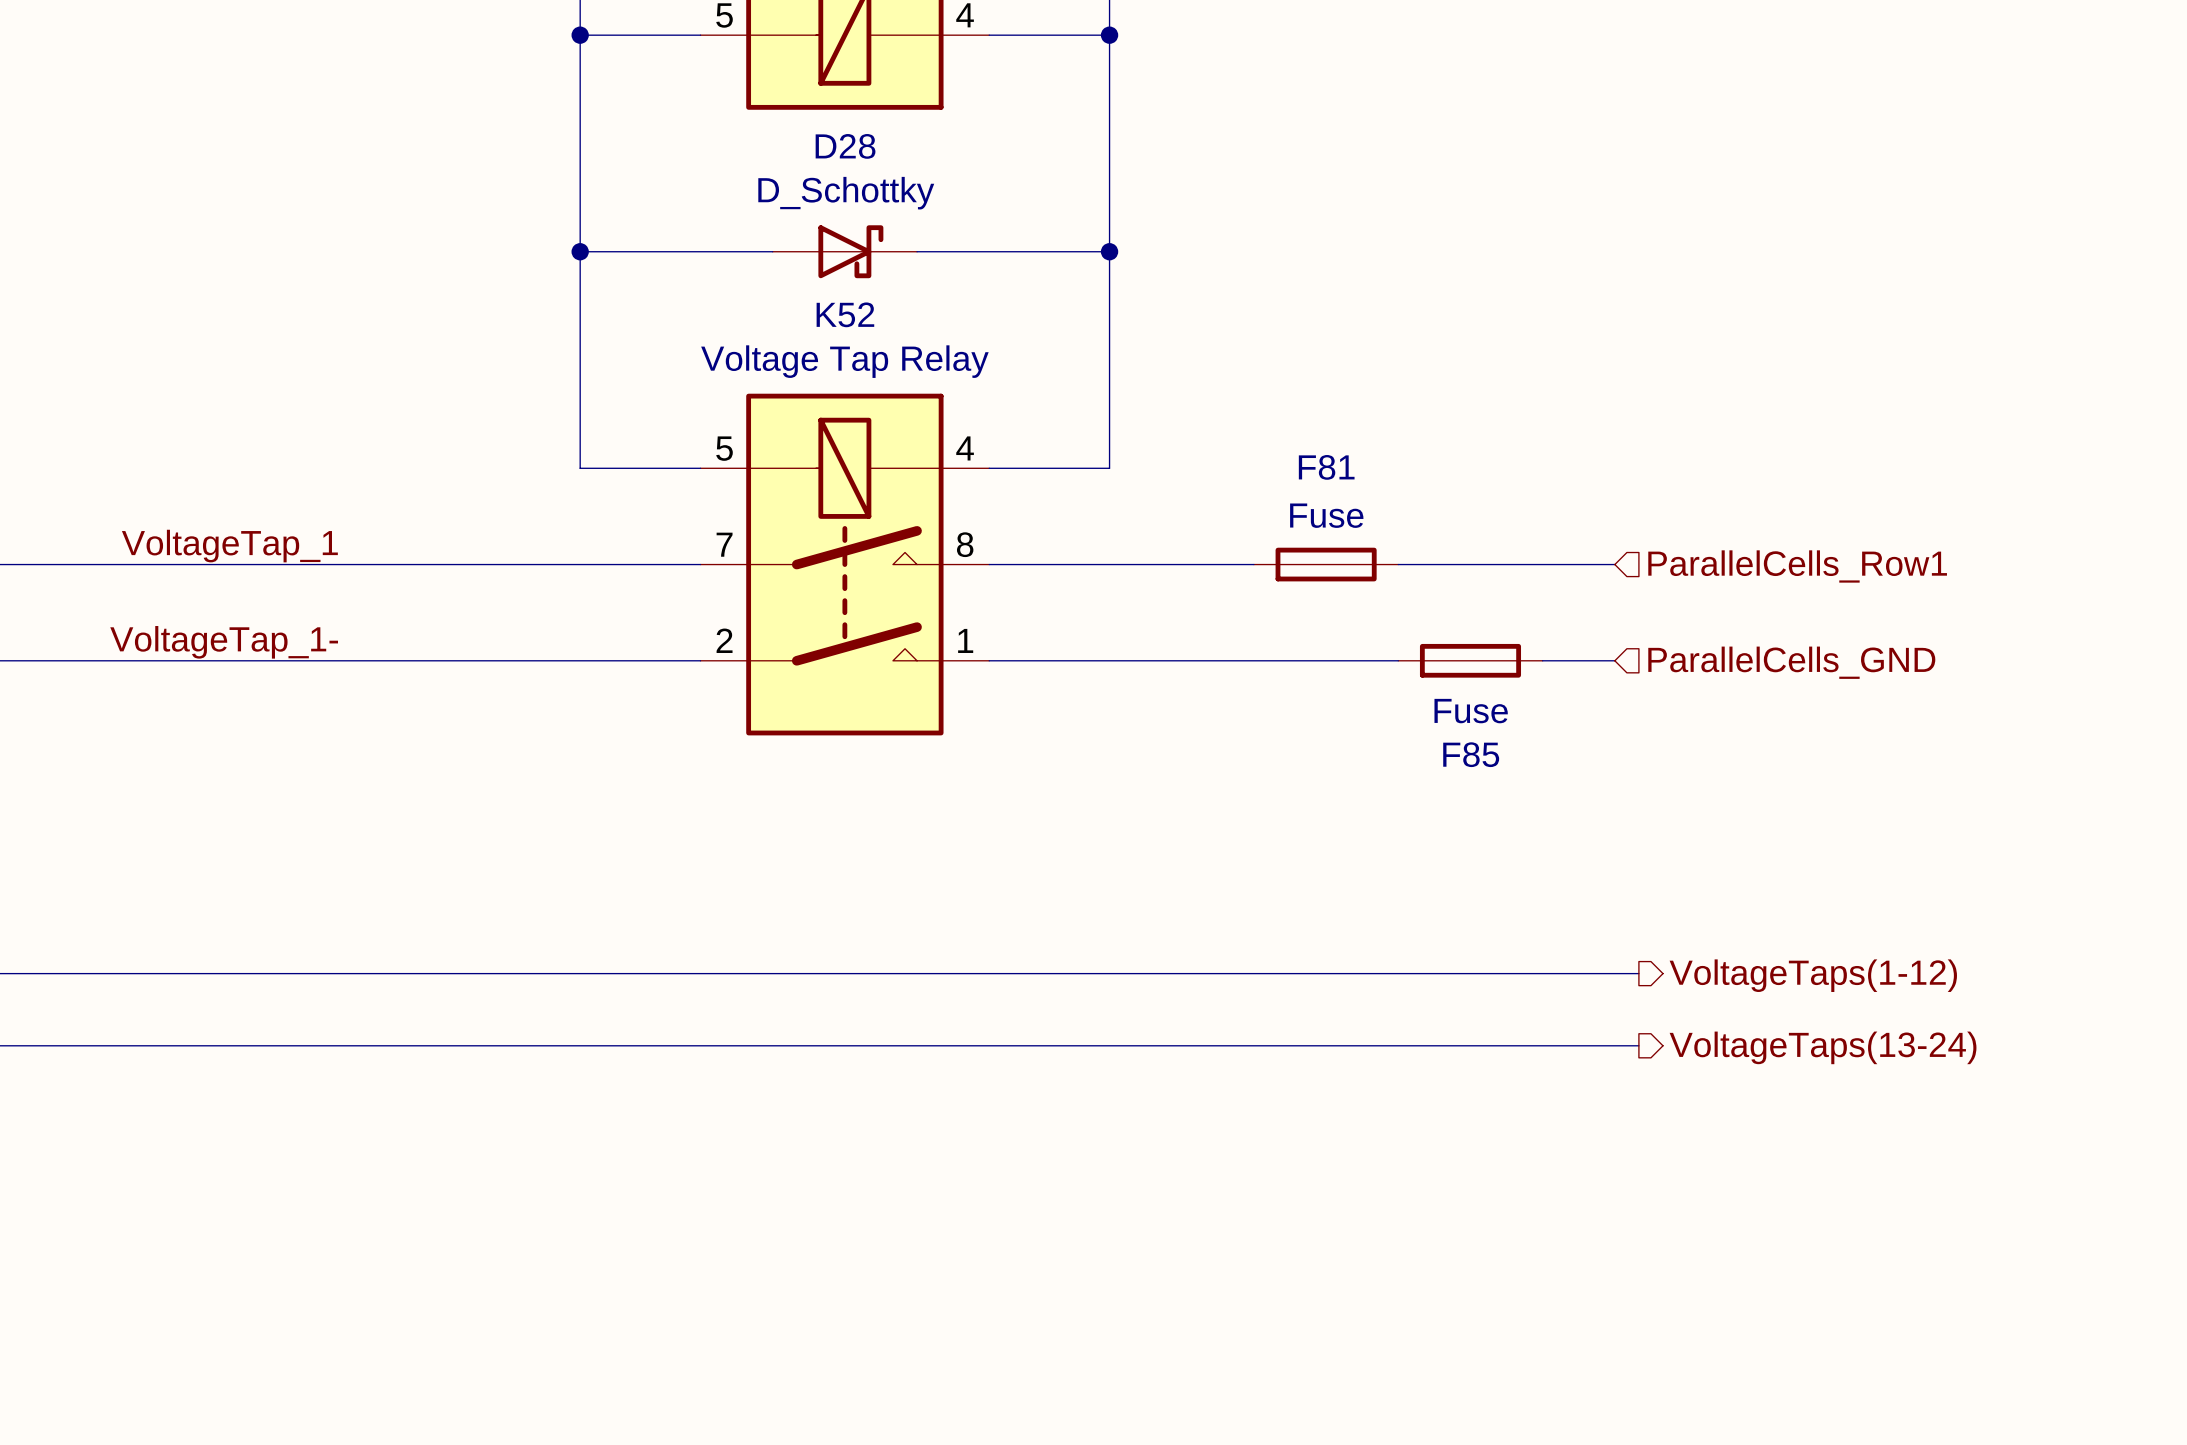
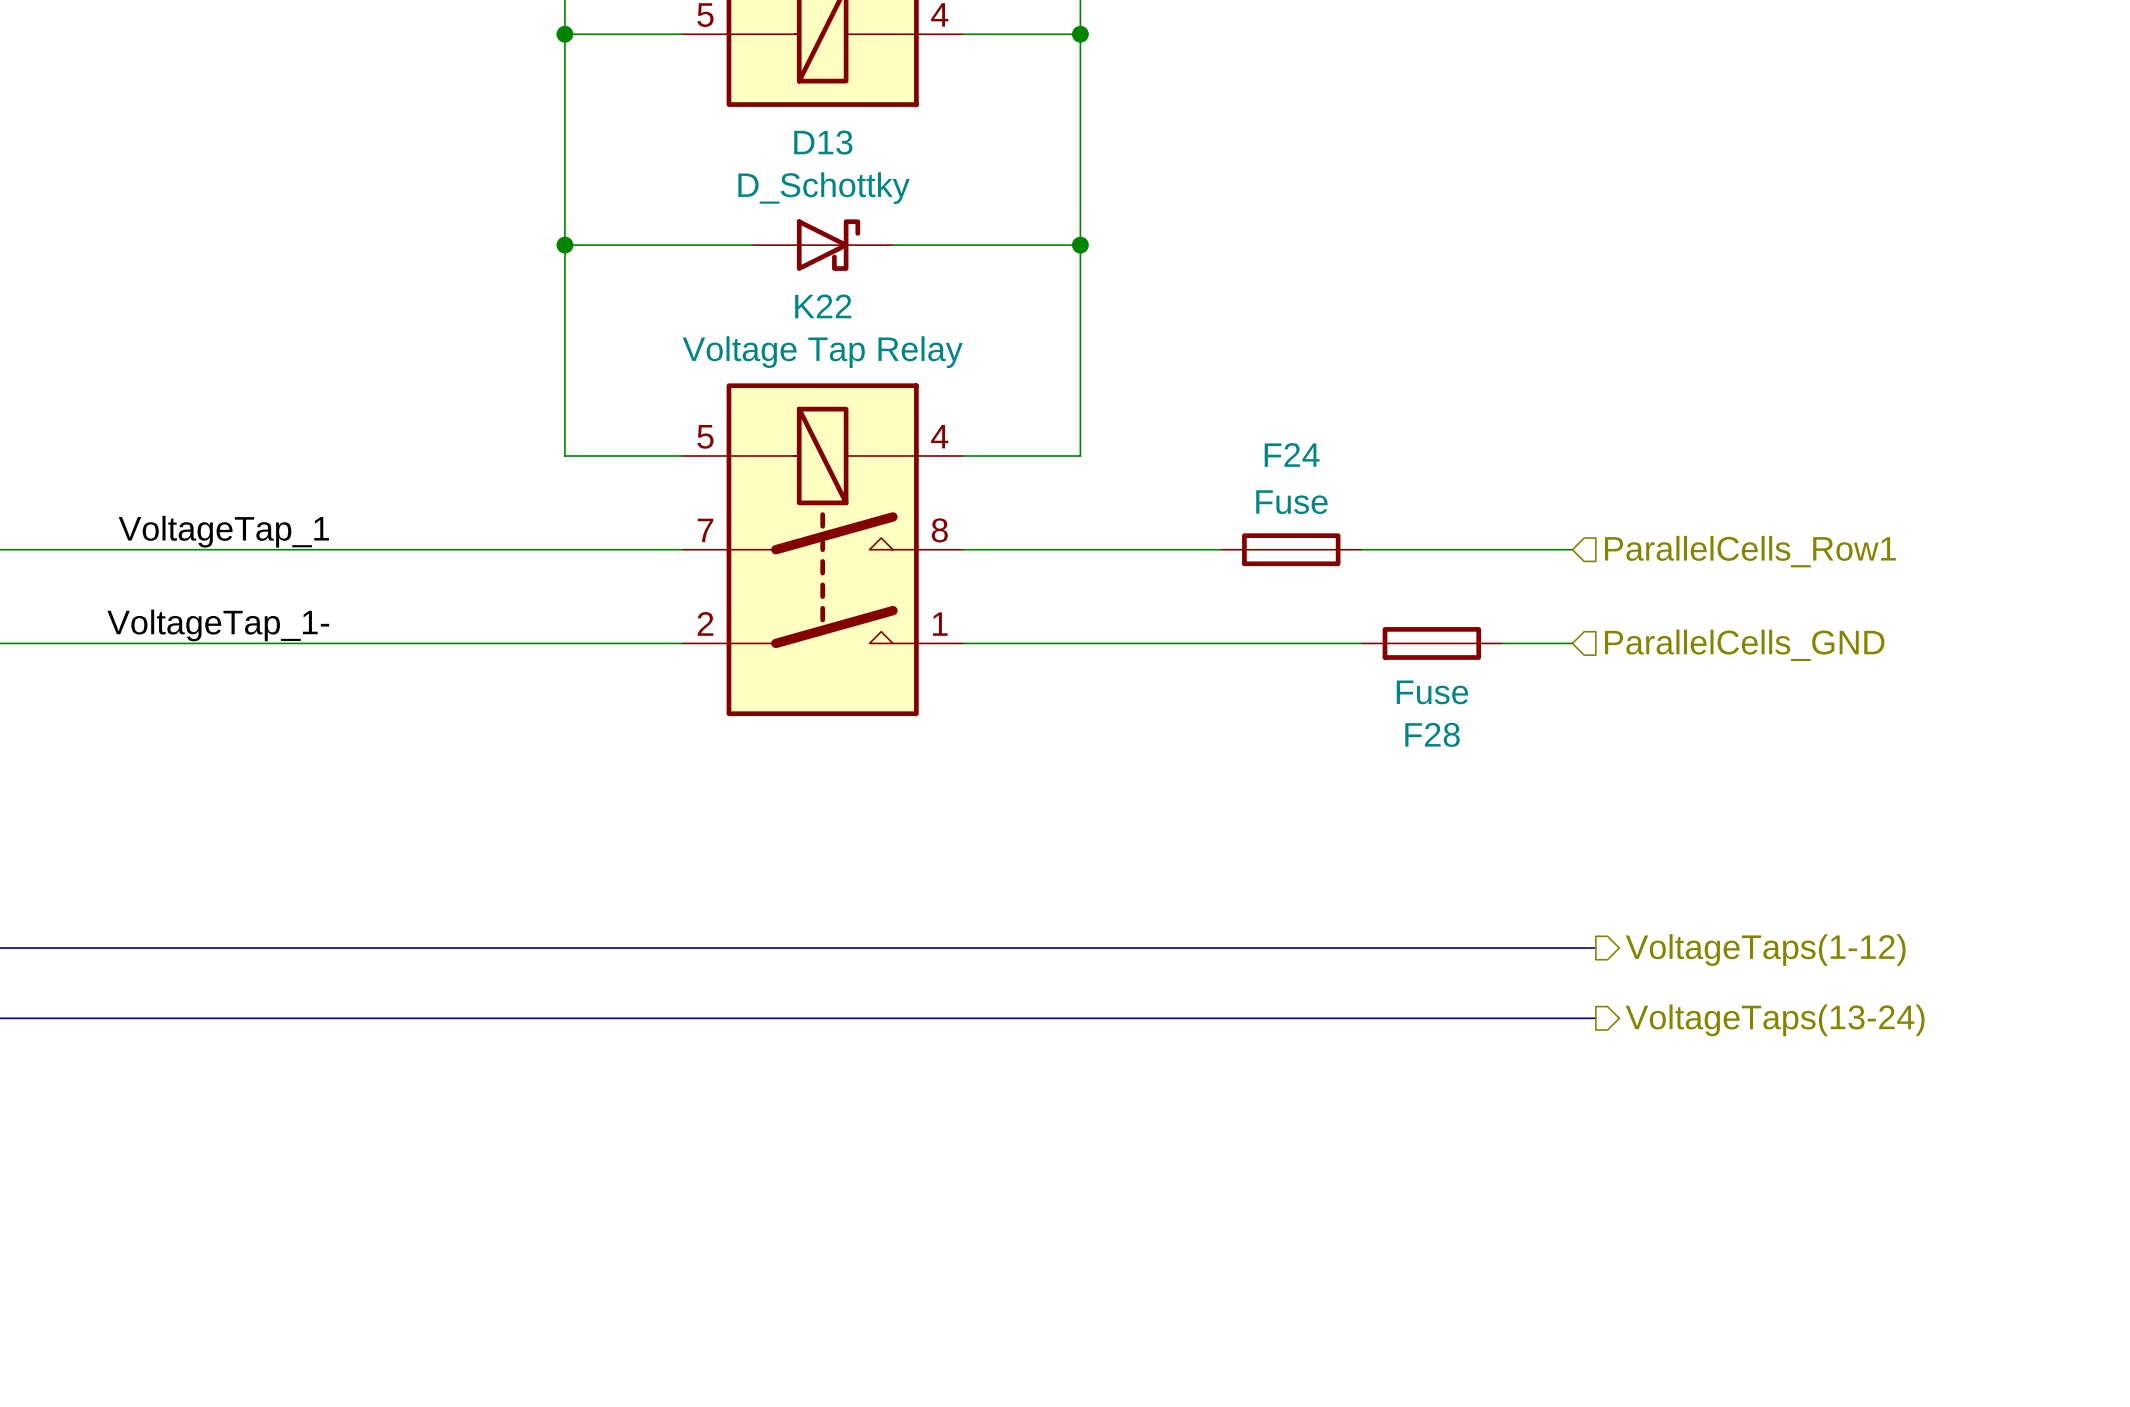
D28 name: D28 (845, 146) -> D13 (823, 142)
K52 name: K52 (845, 314) -> K22 (823, 306)
F81 name: F81 (1326, 467) -> F24 (1292, 454)
F85 name: F85 (1471, 754) -> F28 (1432, 734)

